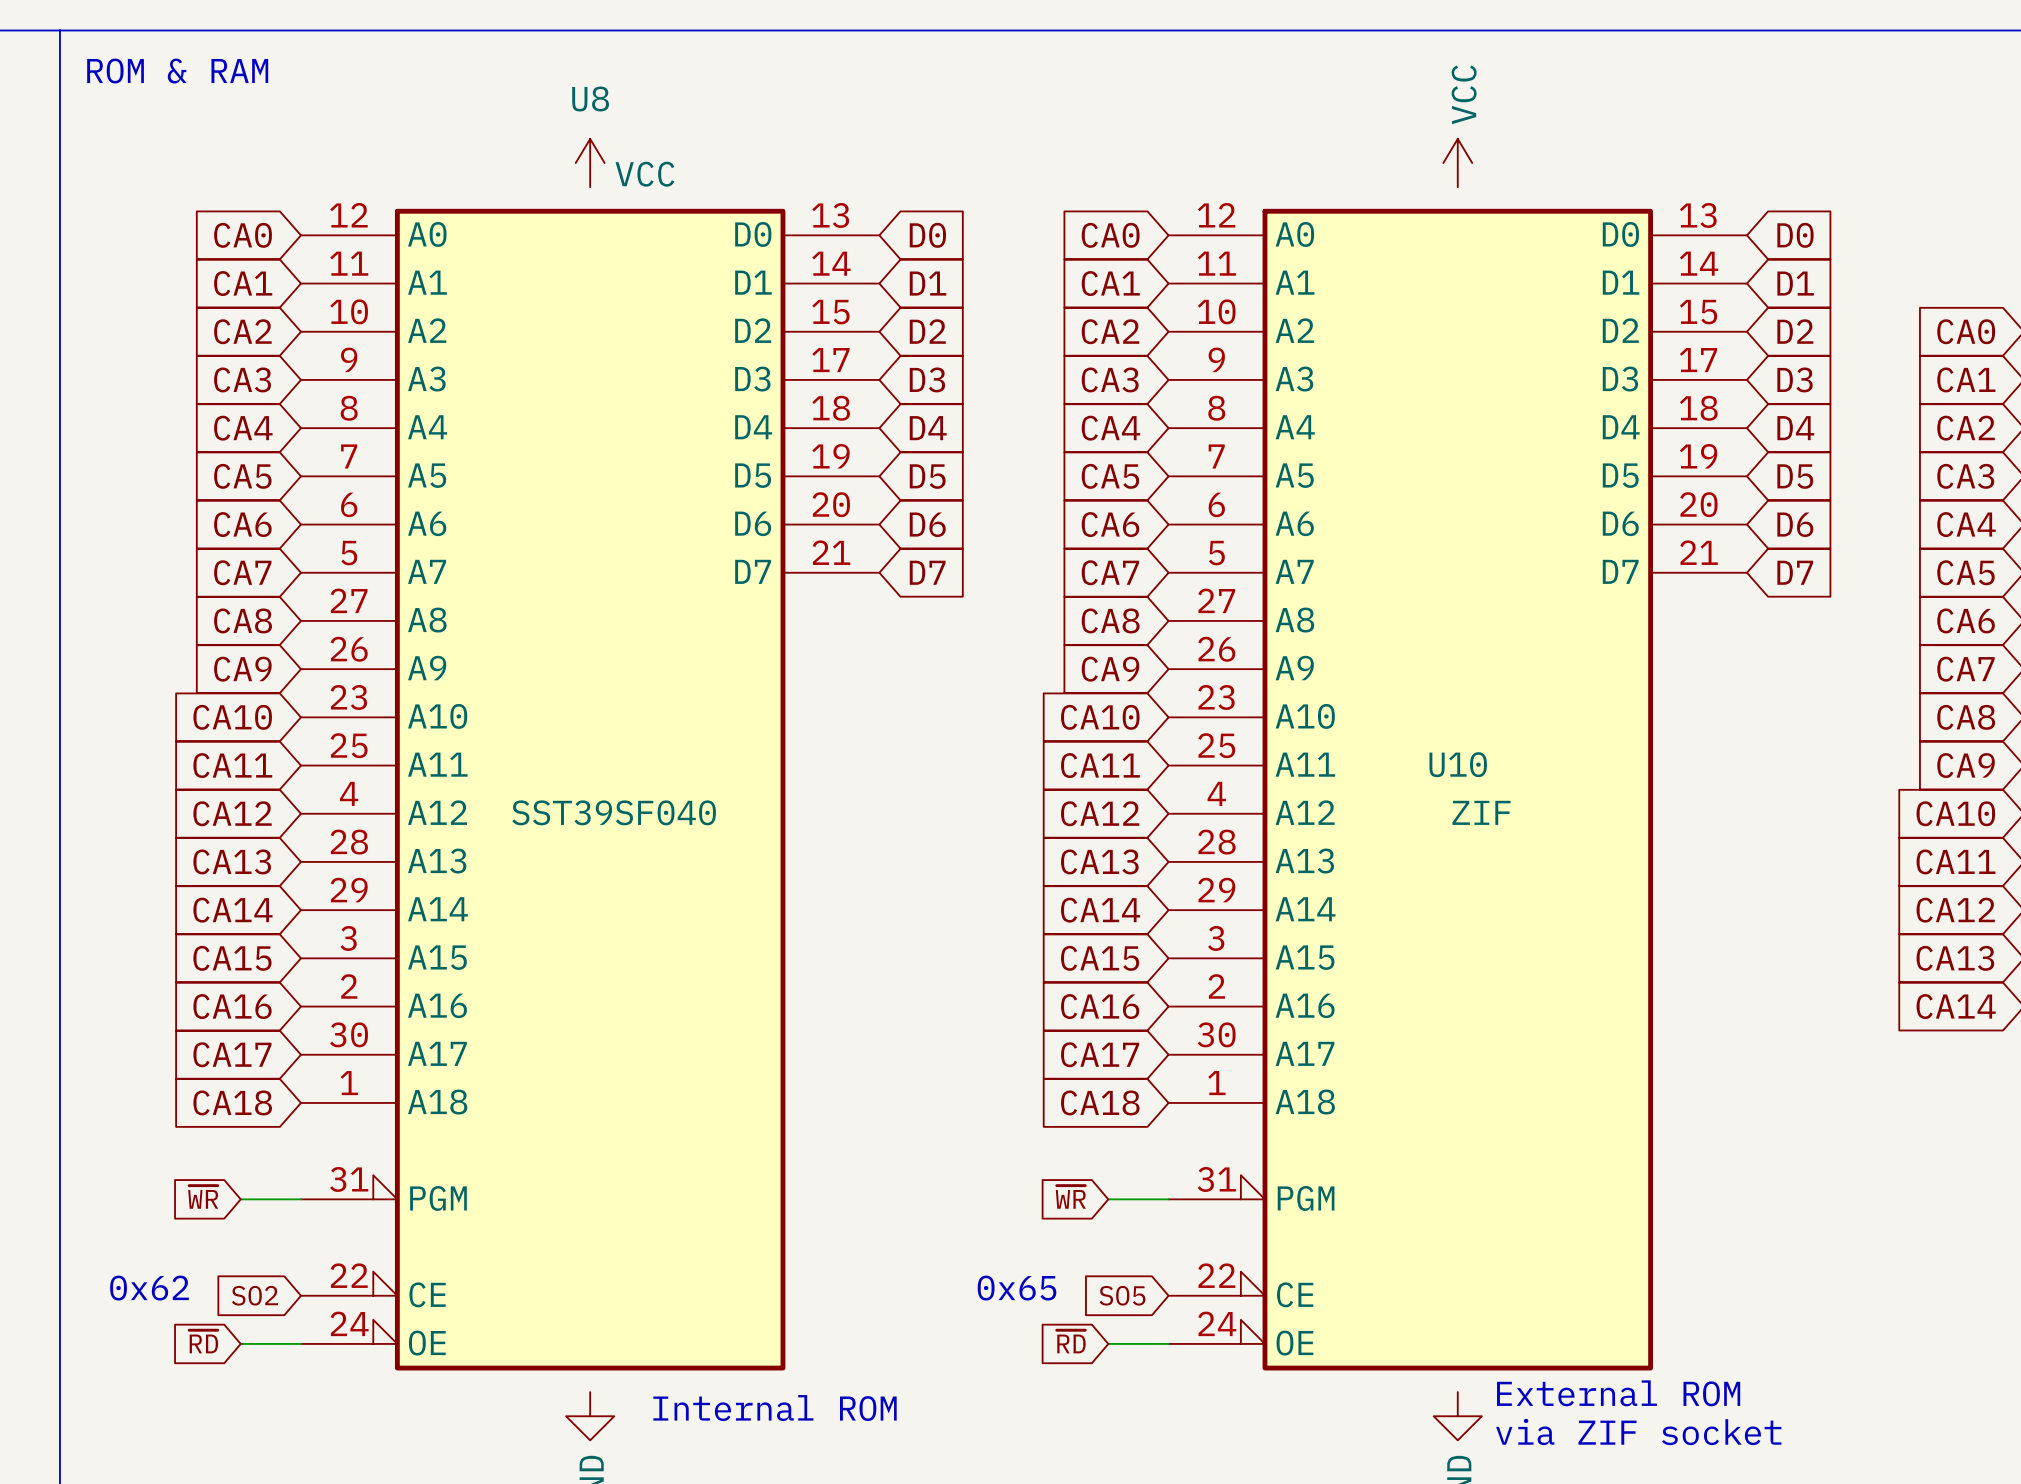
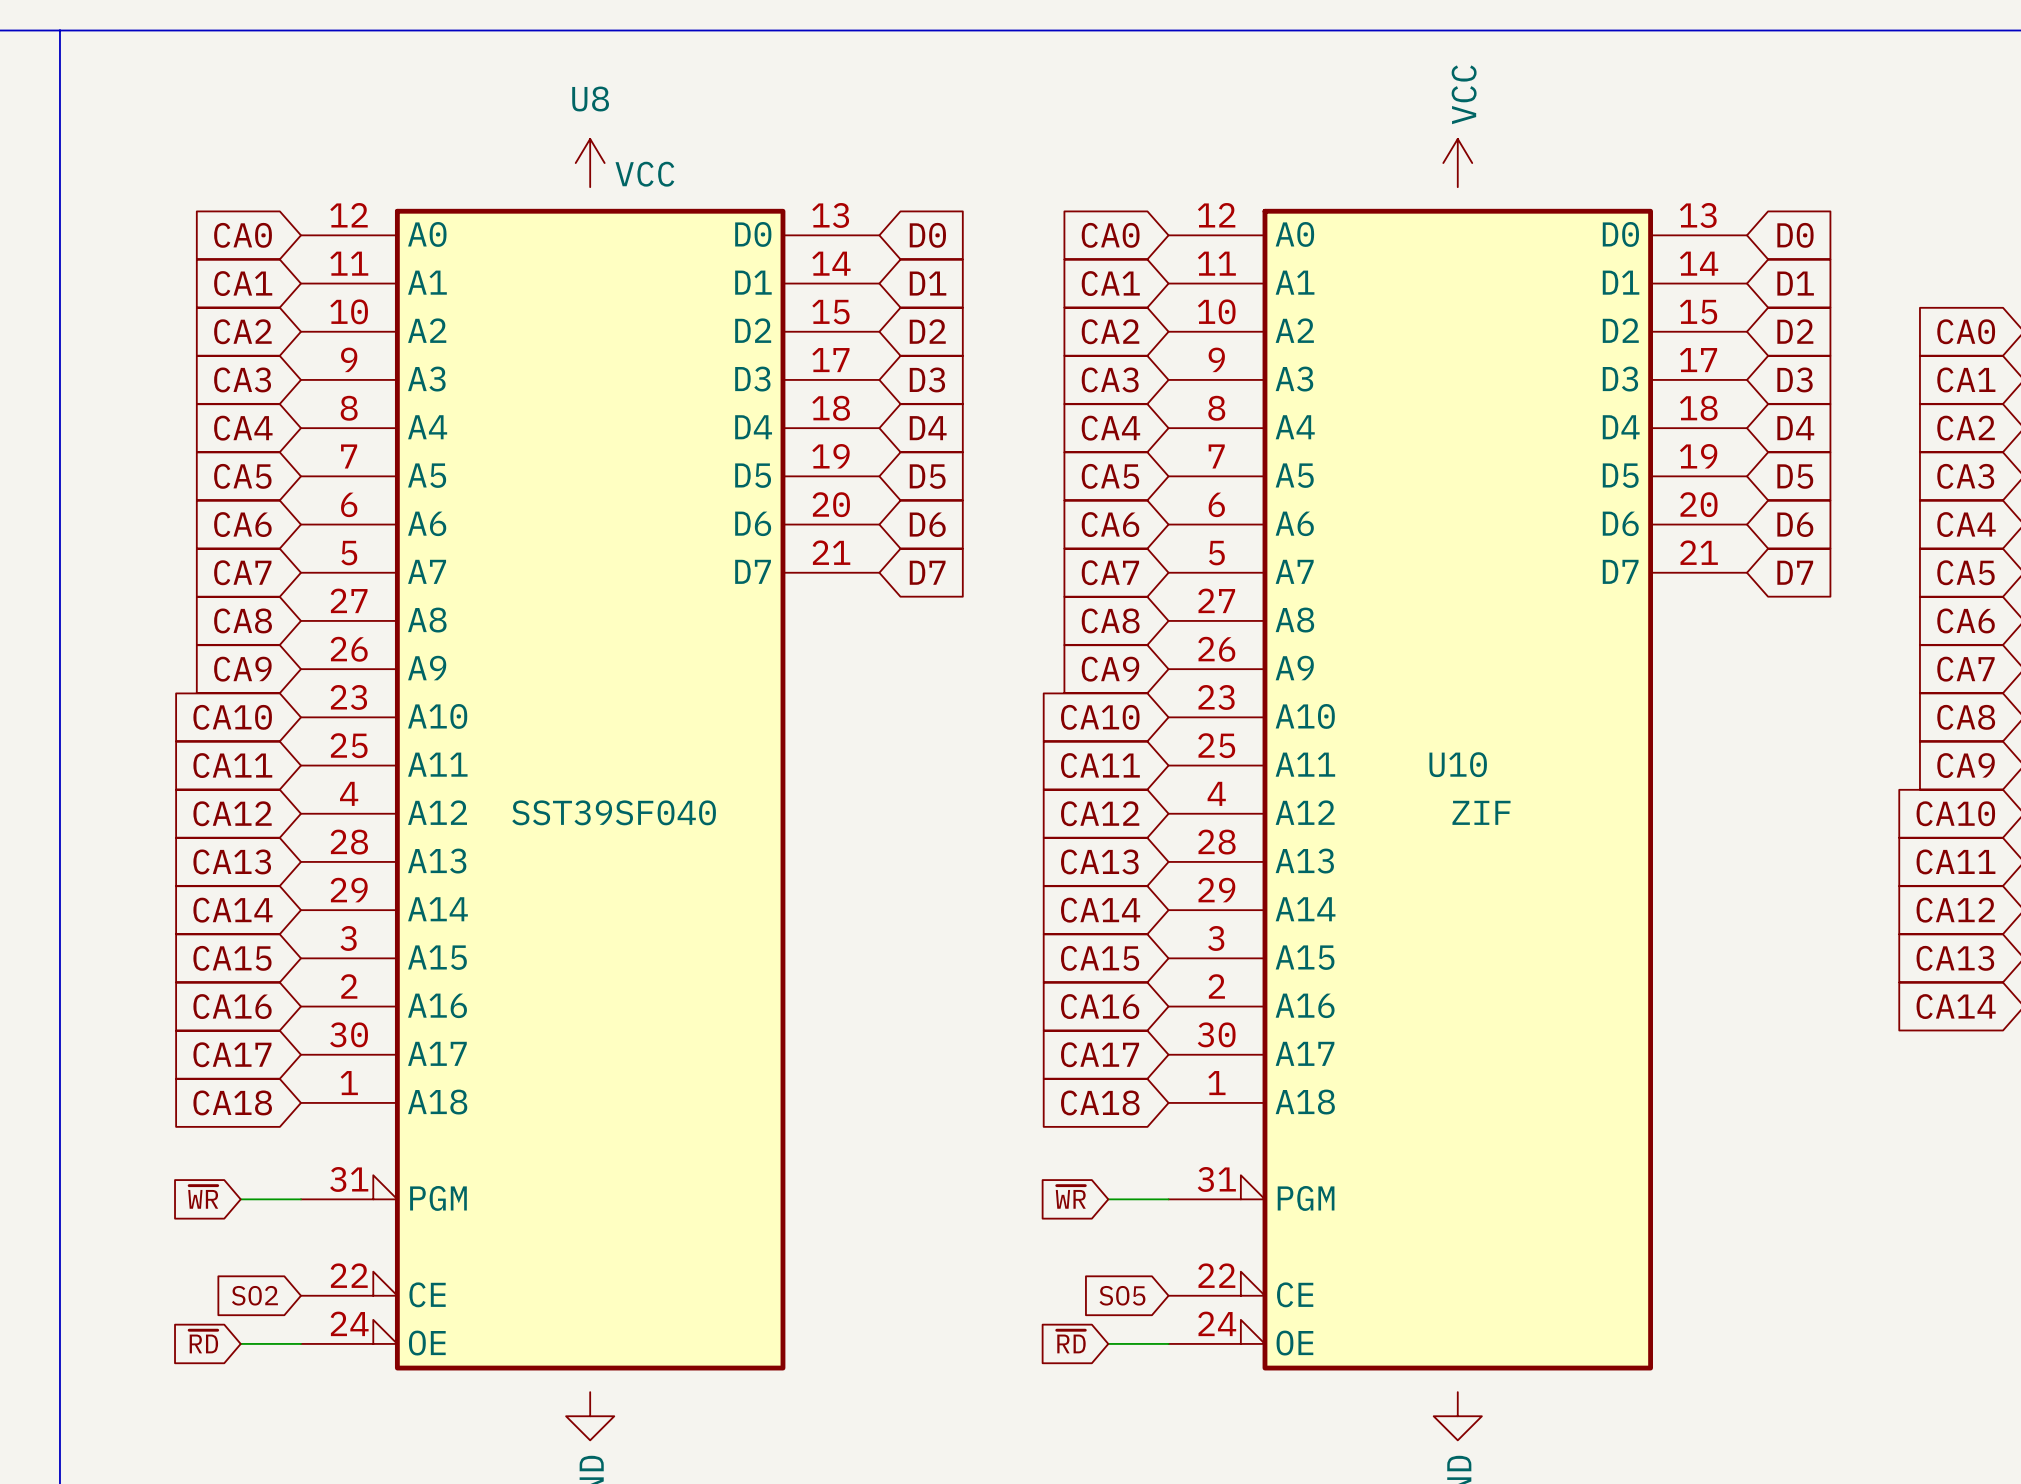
text: ROM & RAM (177, 71) -> none
text: 0x62 (149, 1288) -> none
text: 0x65 (1017, 1288) -> none
text: External ROM (1618, 1393) -> none
text: Internal ROM (775, 1408) -> none
text: via ZIF socket (1638, 1432) -> none

